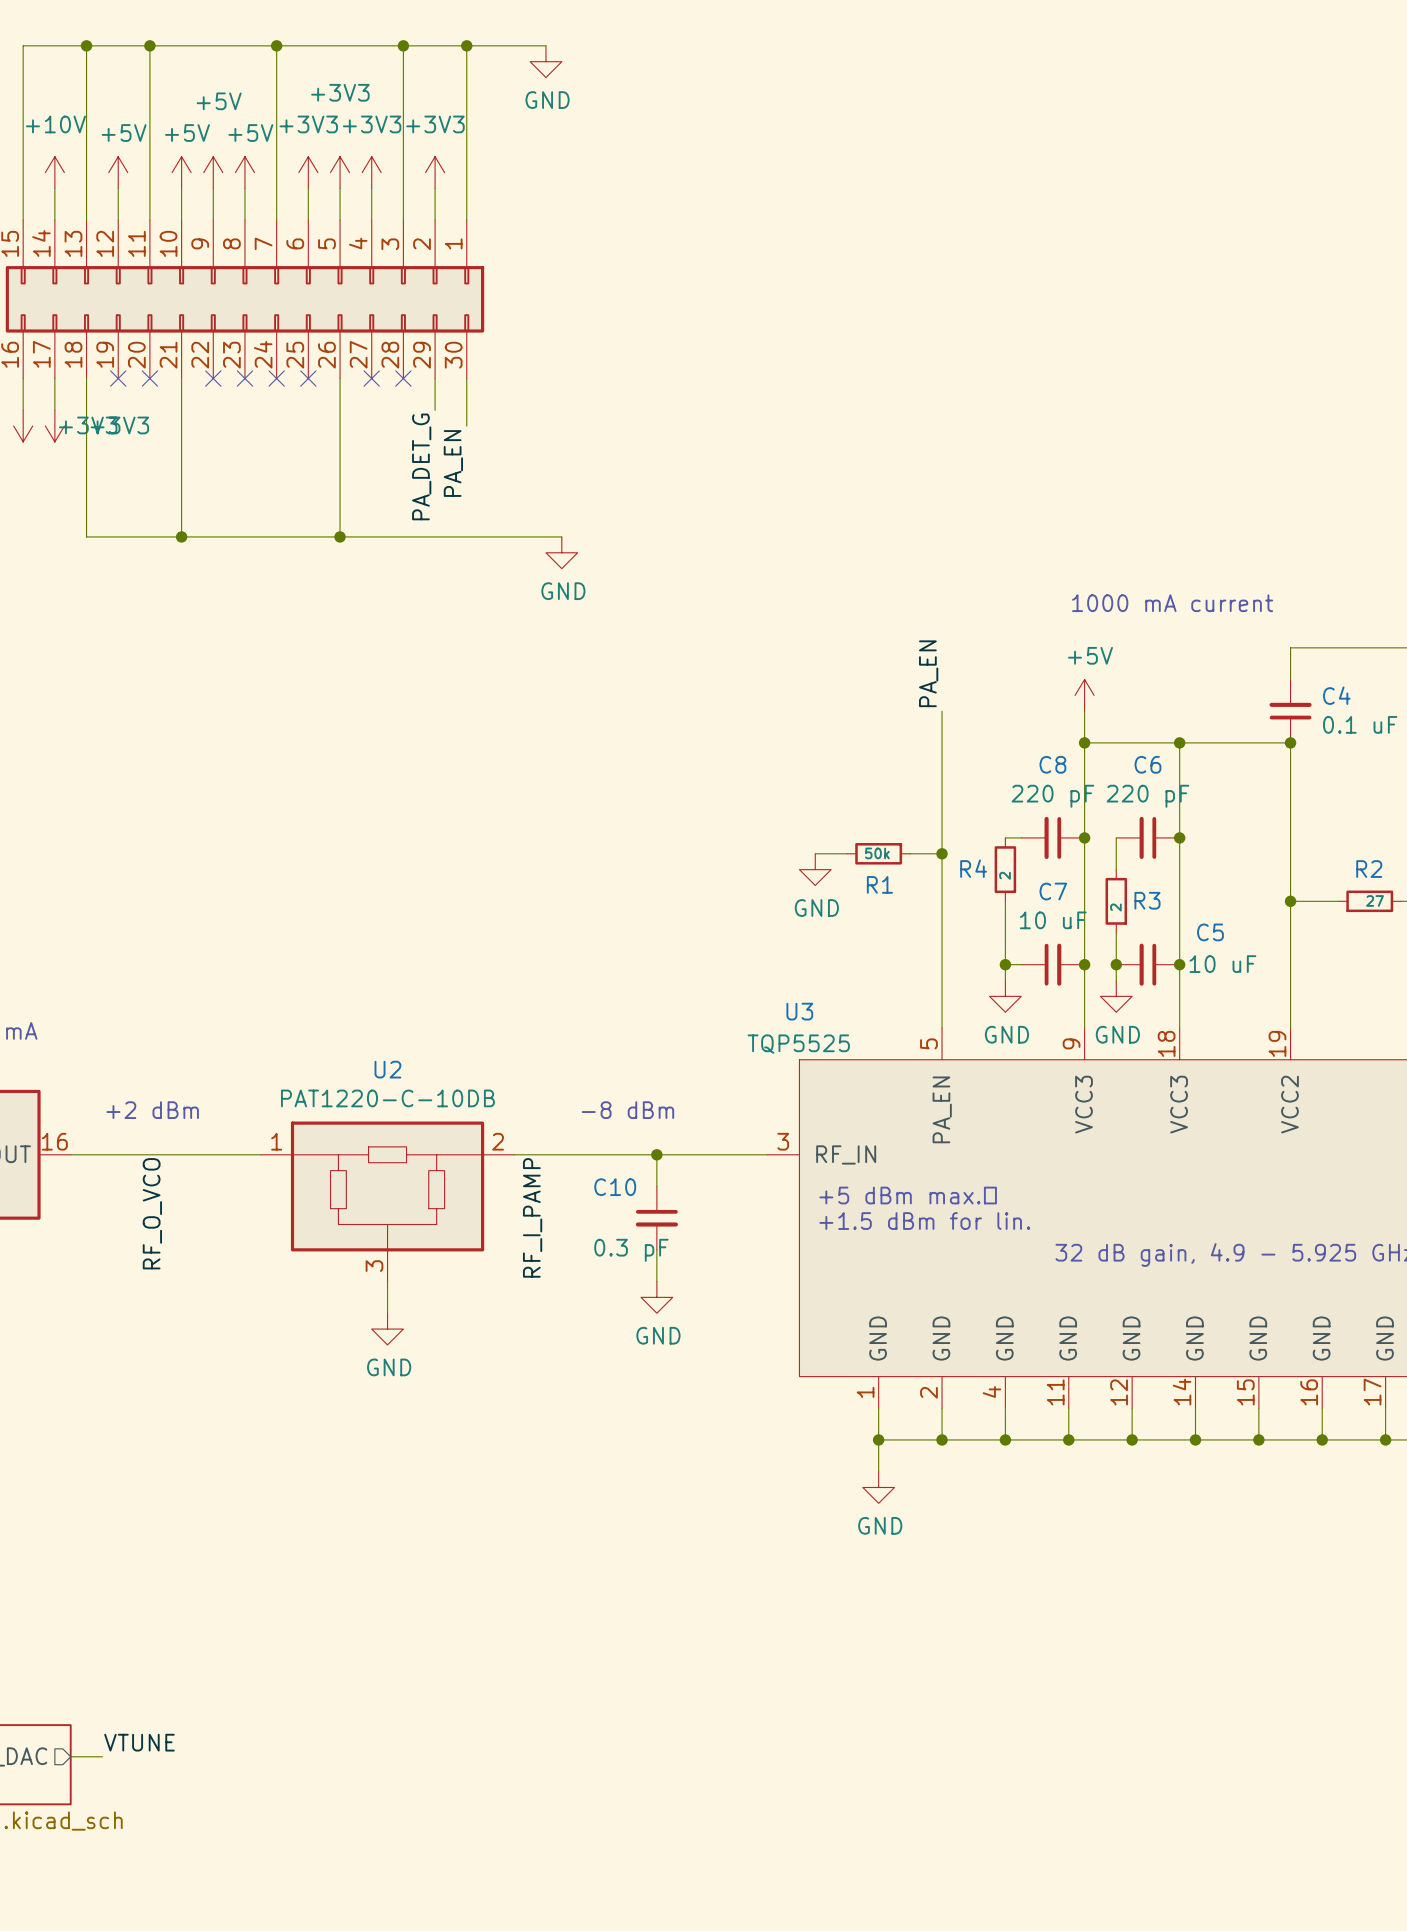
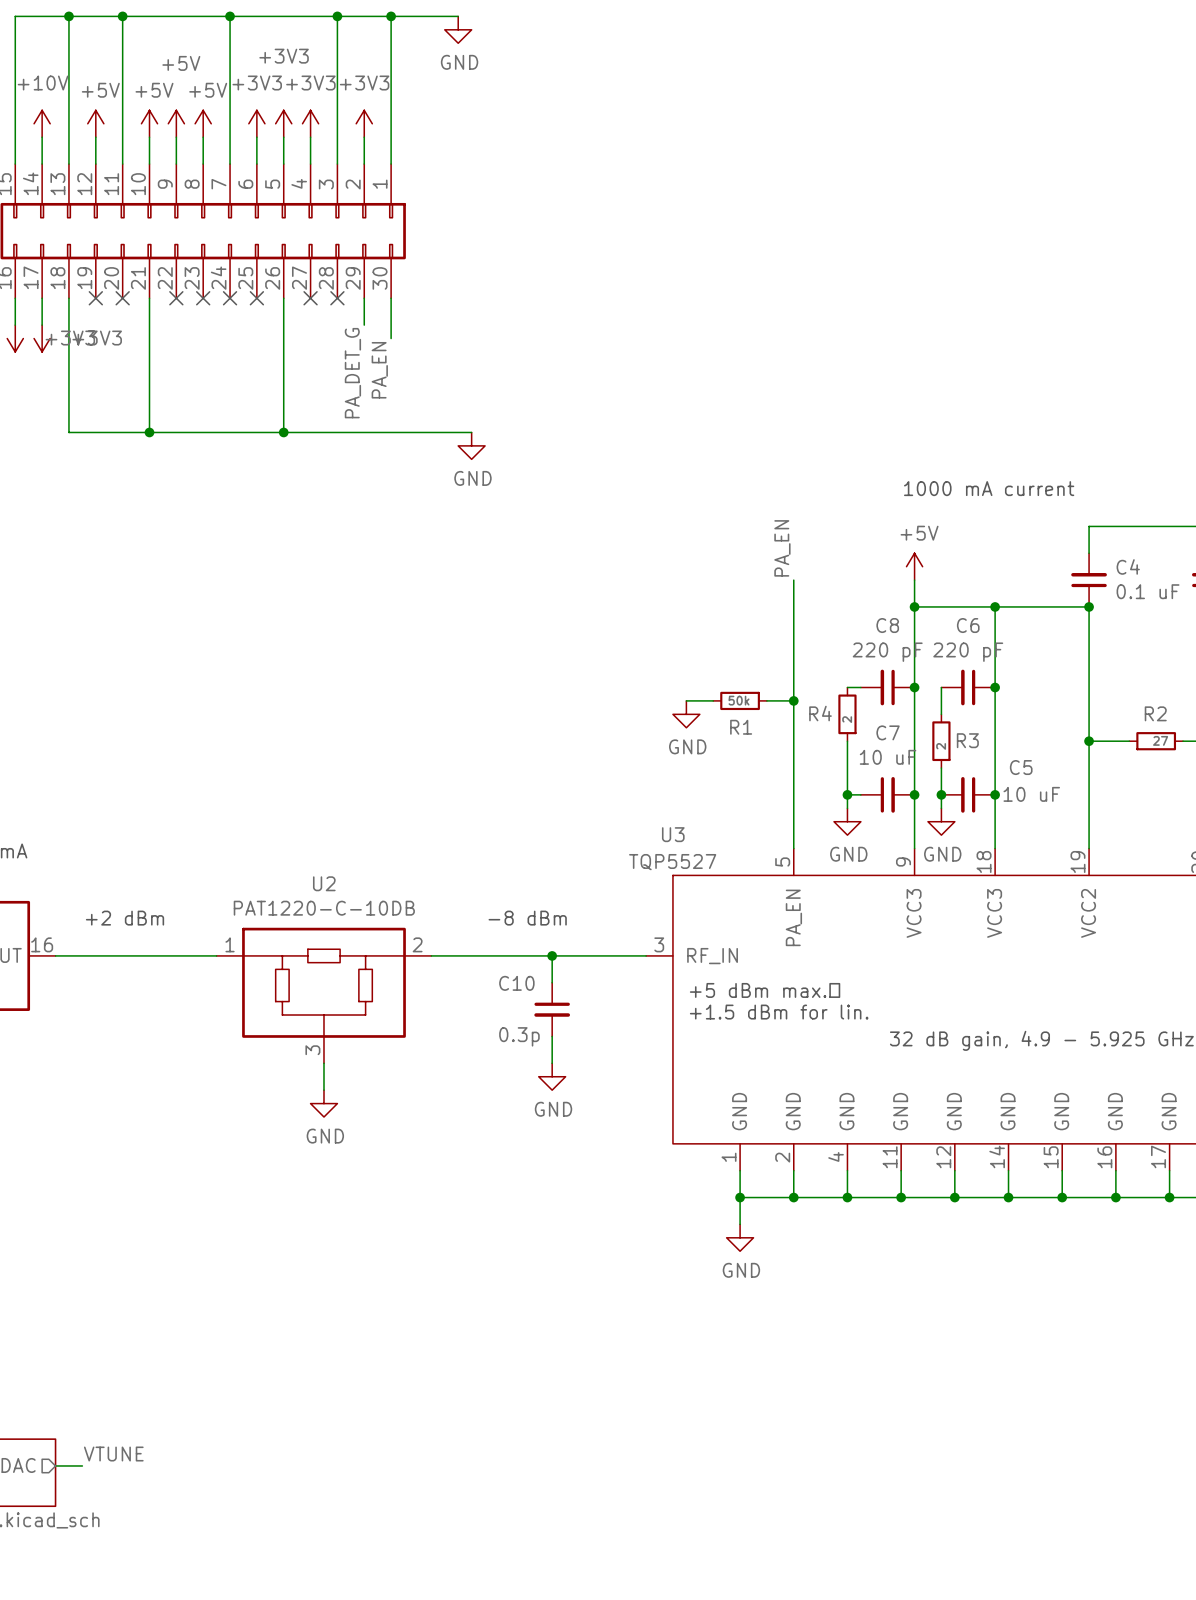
U3 value: TQP5525 (798, 1044) -> TQP5527 (672, 862)
label: RF_O_VCO (152, 1213) -> none
label: RF_I_PAMP (532, 1217) -> none
C10 value: 0.3 pF (631, 1250) -> 0.3p (519, 1036)

